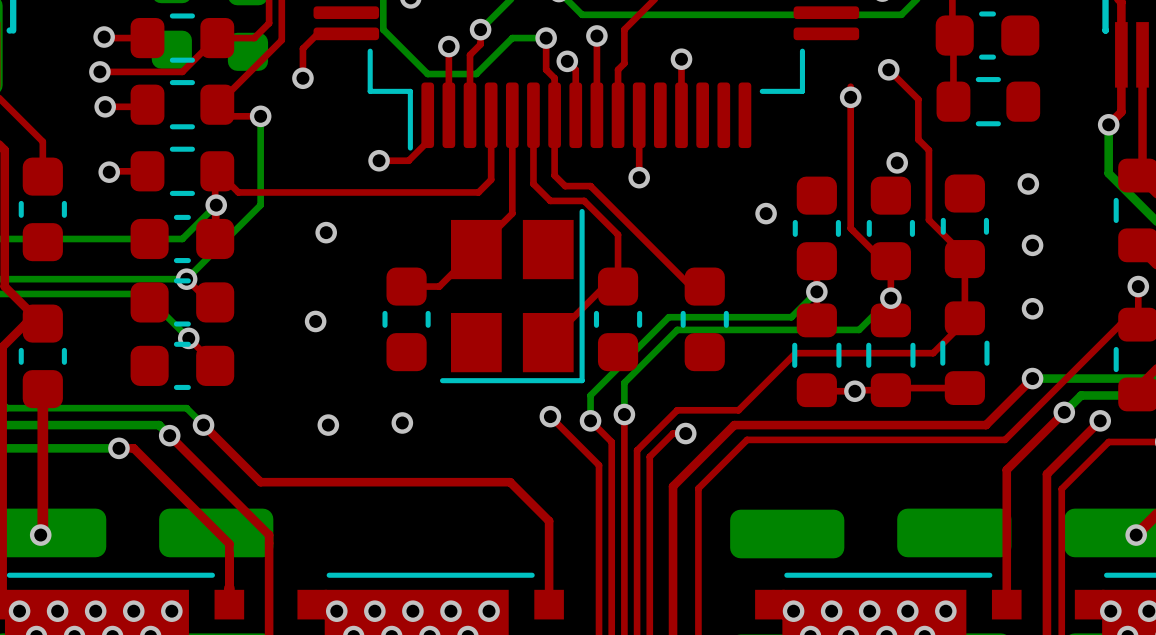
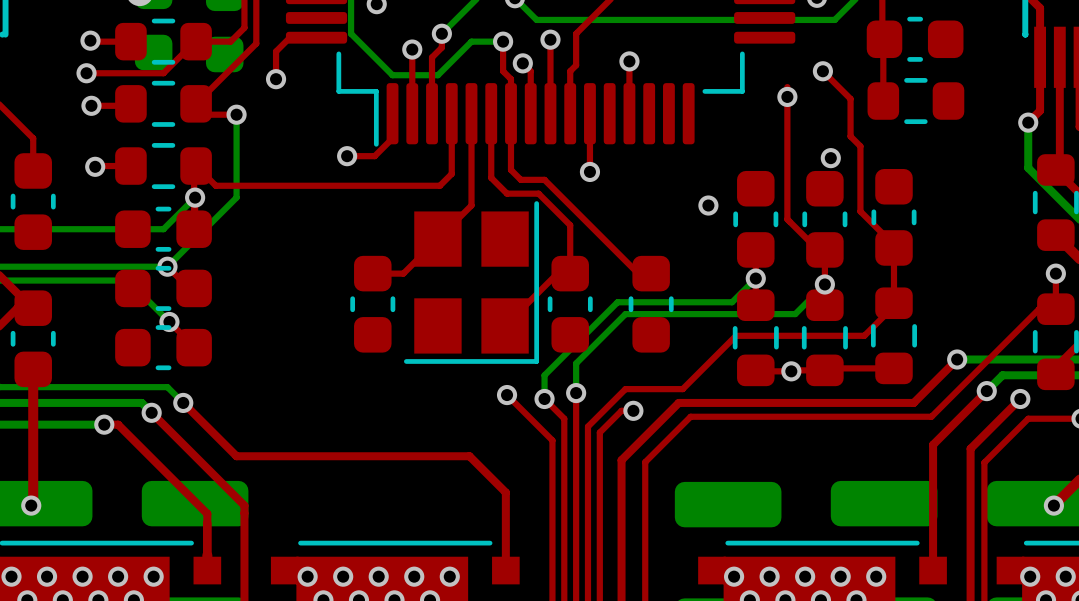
via: (1028, 184) -> none
via: (326, 232) -> none
via: (1032, 245) -> none
via: (1032, 308) -> none
via: (315, 321) -> none
via: (402, 422) -> none
via: (328, 425) -> none

